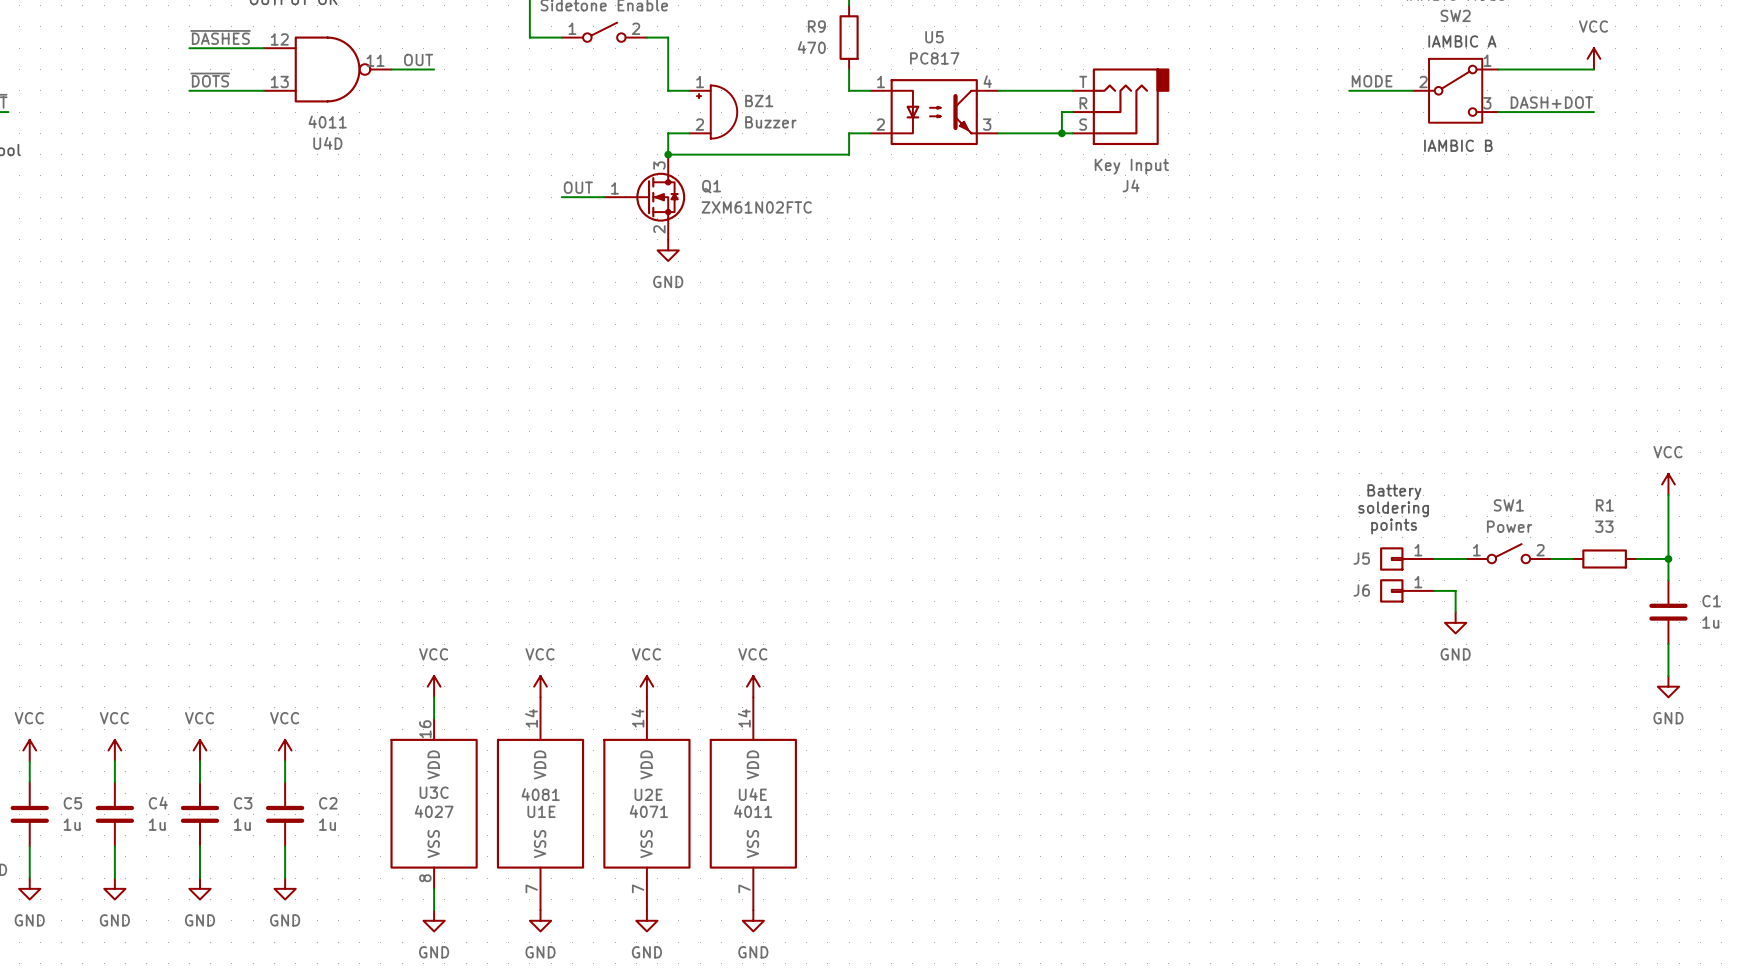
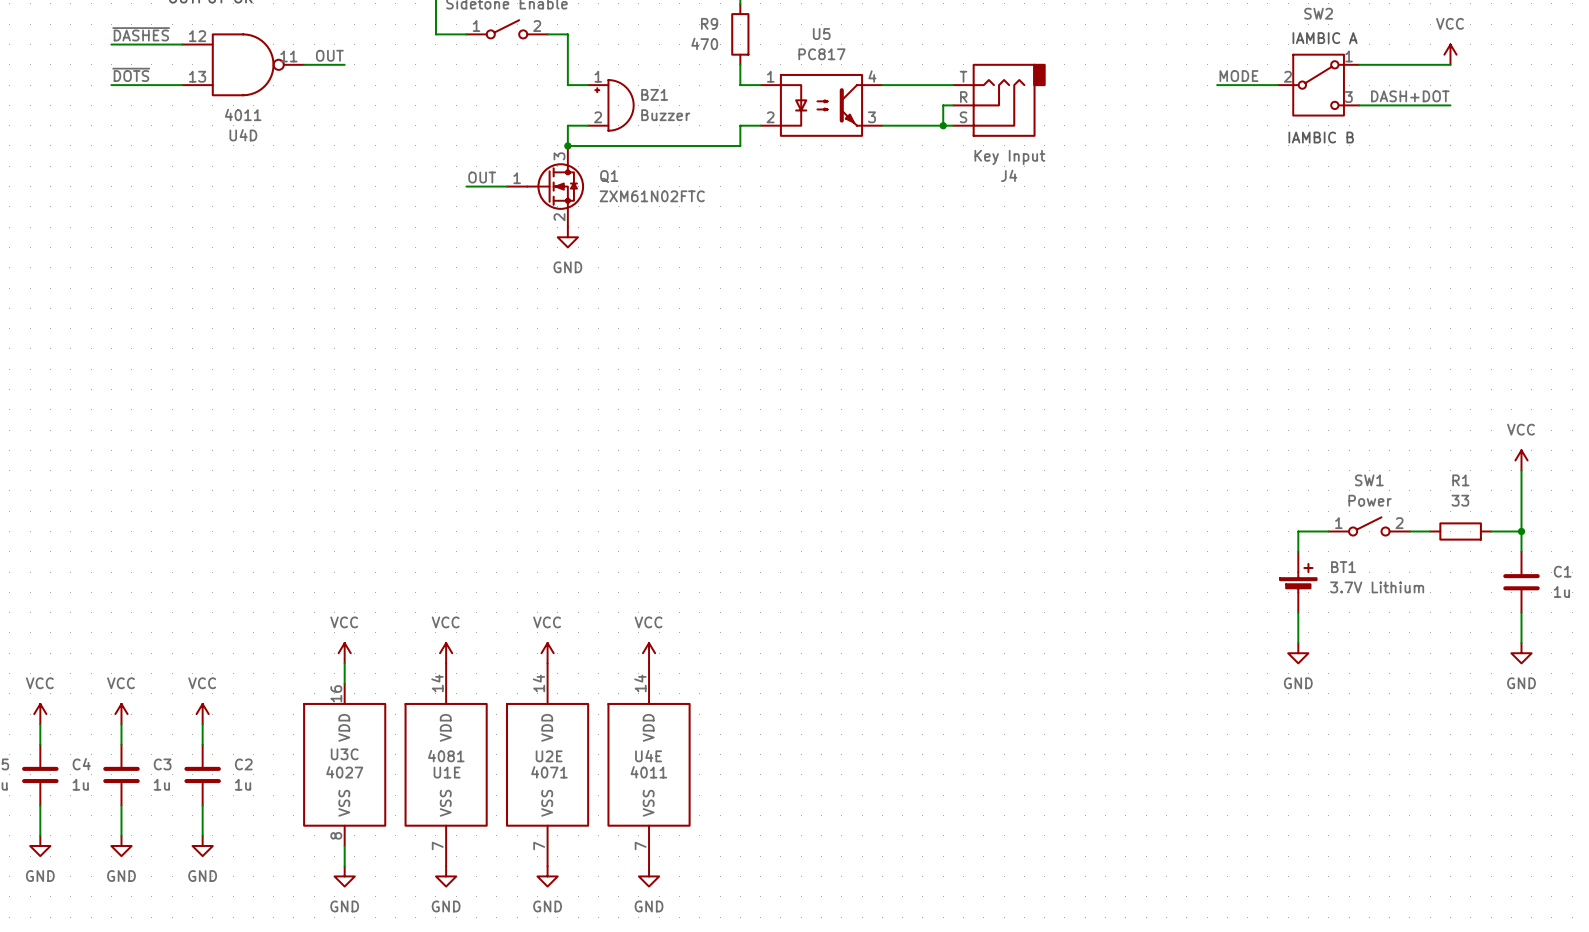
text: Battery (1394, 492) -> none
text: soldering (1393, 509) -> none
text: points (1394, 526) -> none
J5: (1407, 558) -> none
wire: none -> (1298, 531) (1298, 551)
J6: (1407, 590) -> none
wire: (1434, 590) (1455, 590) (1455, 612) -> none
BT1: none -> 3.7V Lithium (1298, 582)
power symbol position: GND (1455, 622) -> GND (1298, 653)
wire: none -> (1298, 612) (1298, 643)

